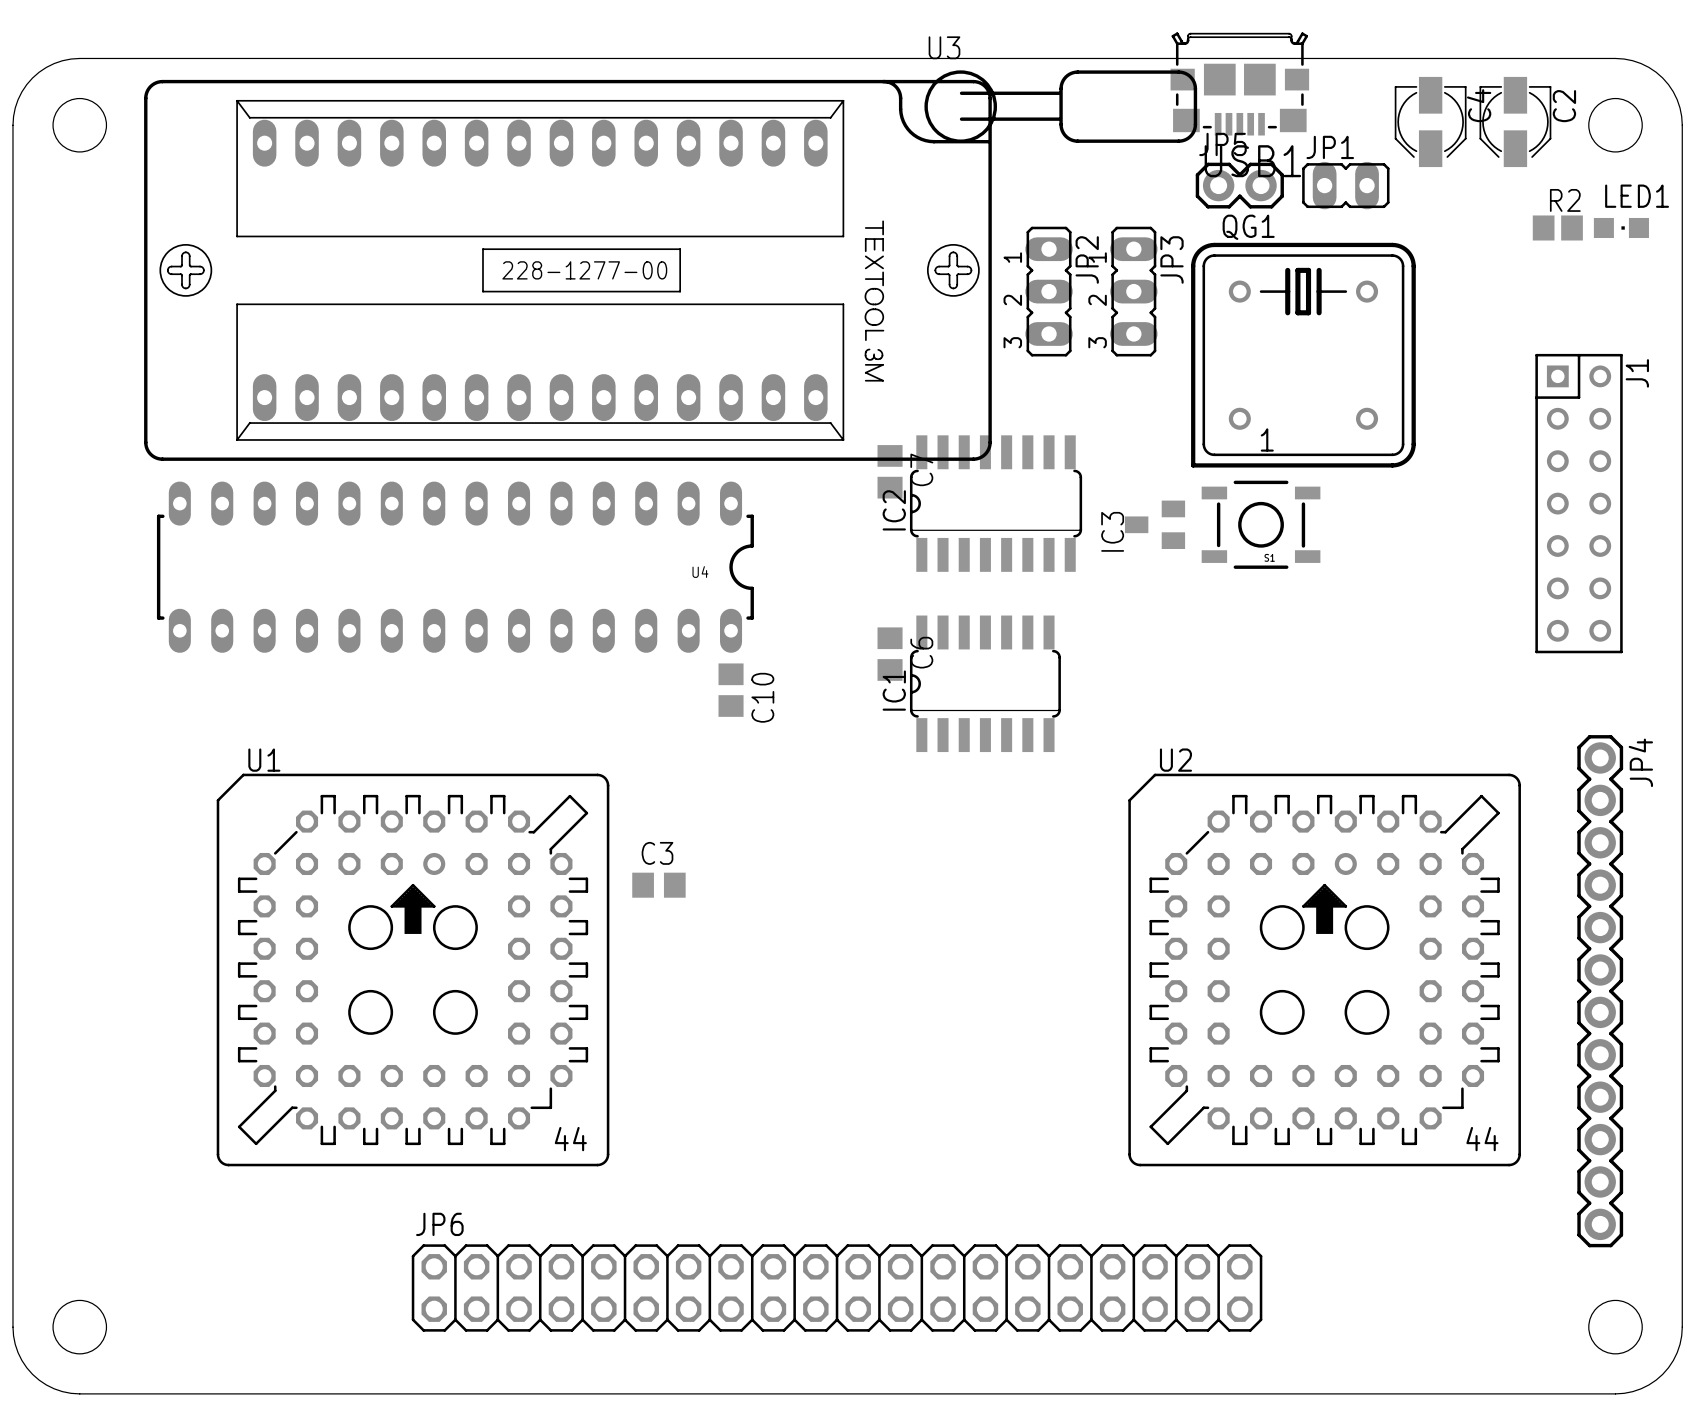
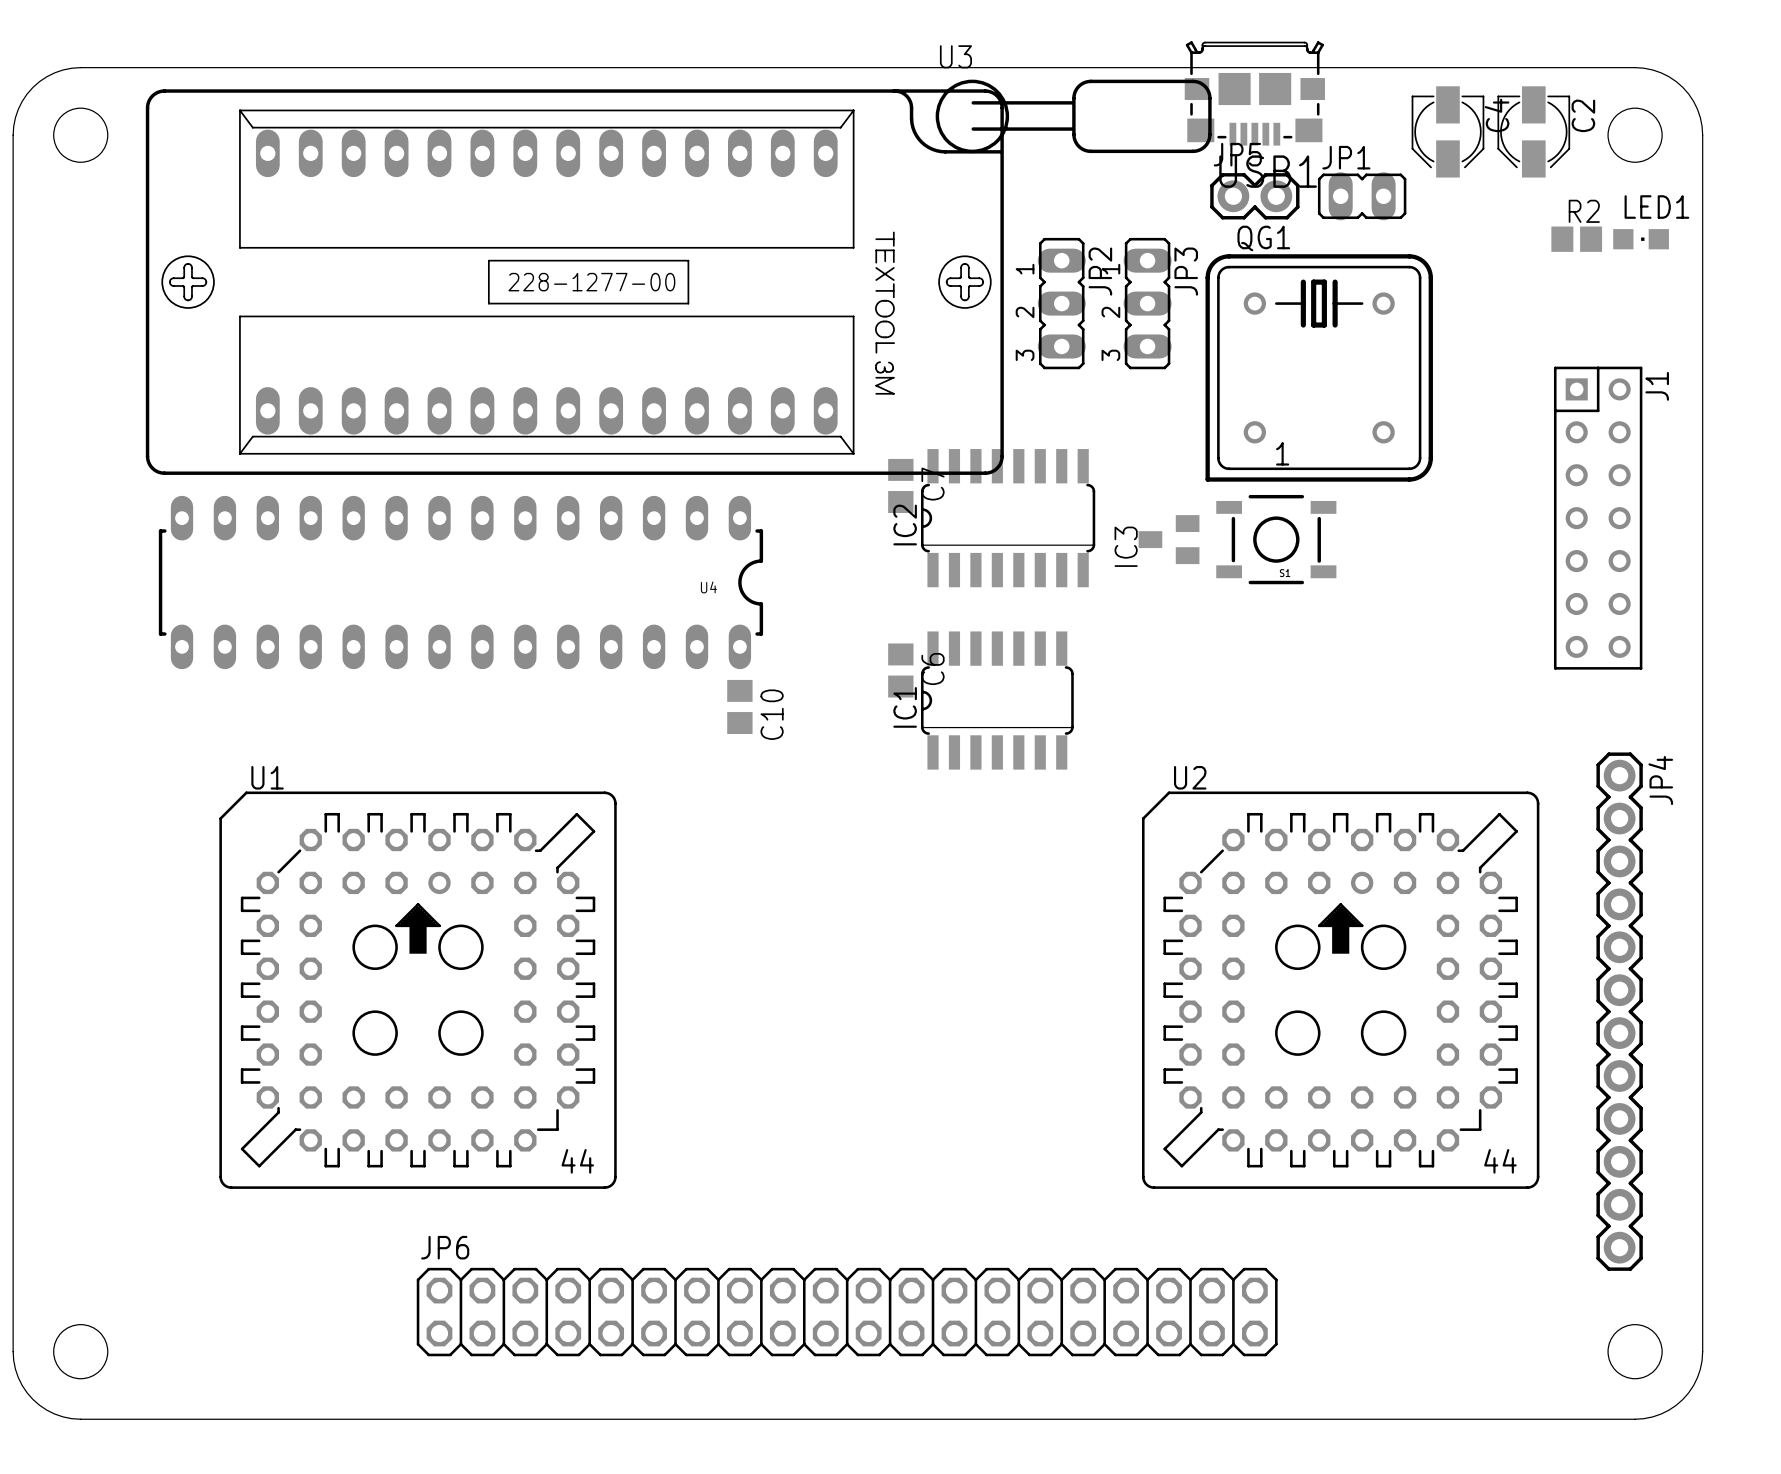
C3: (658, 885) -> none

